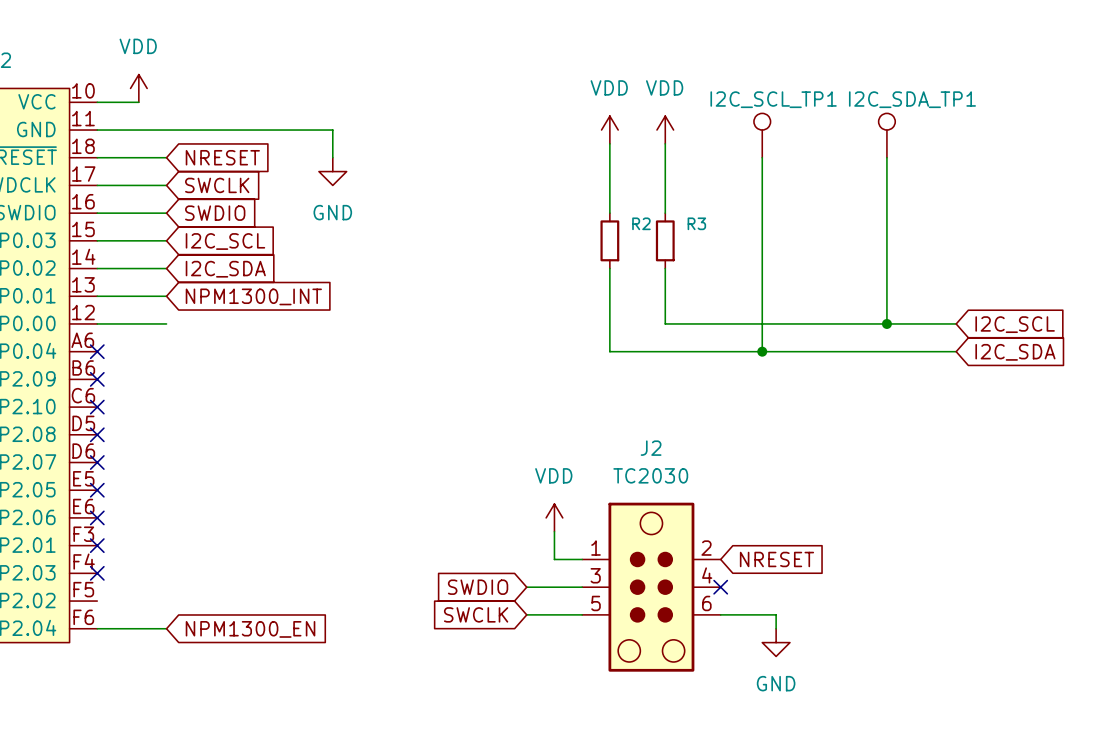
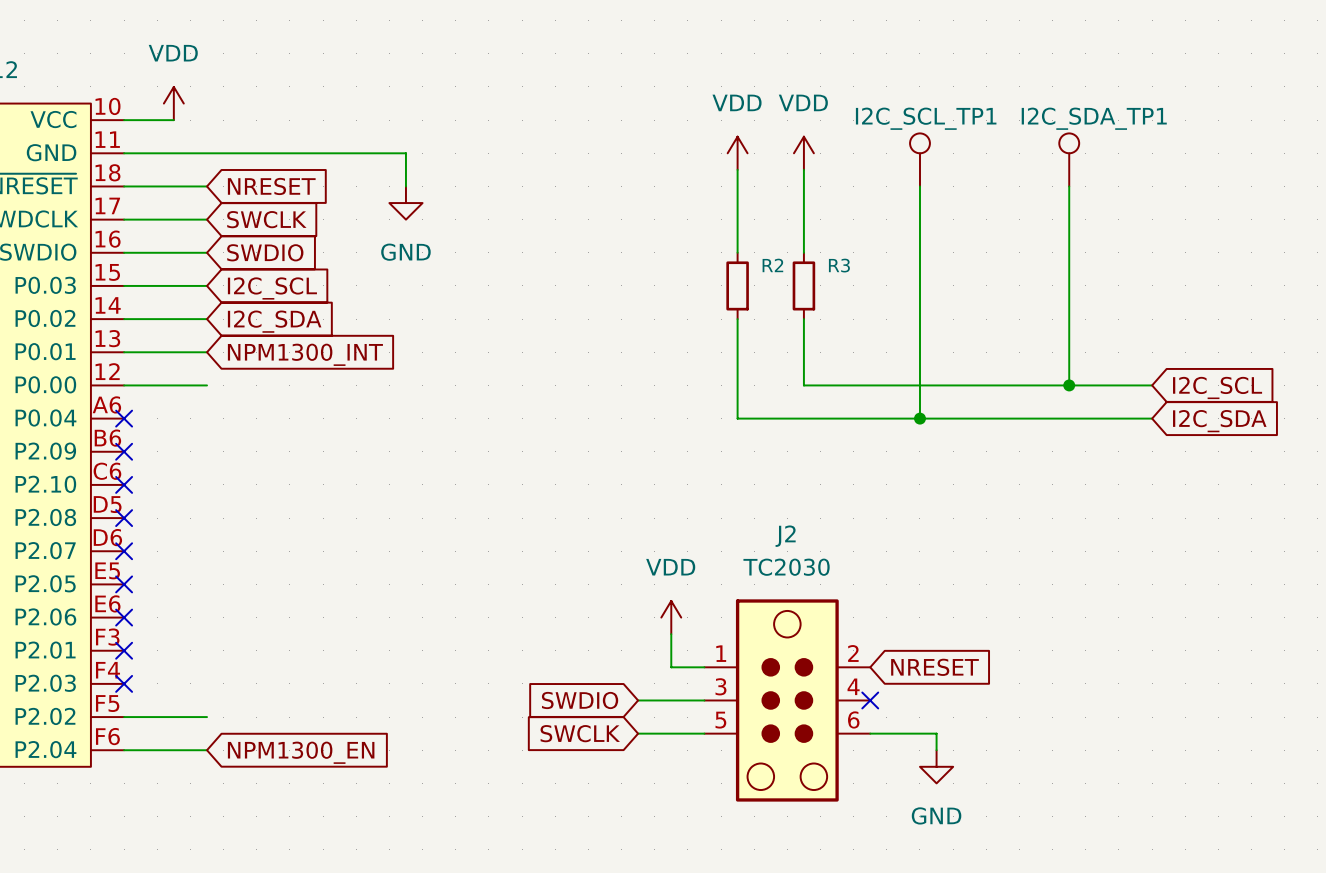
wire: none -> (124, 717) (207, 717)

